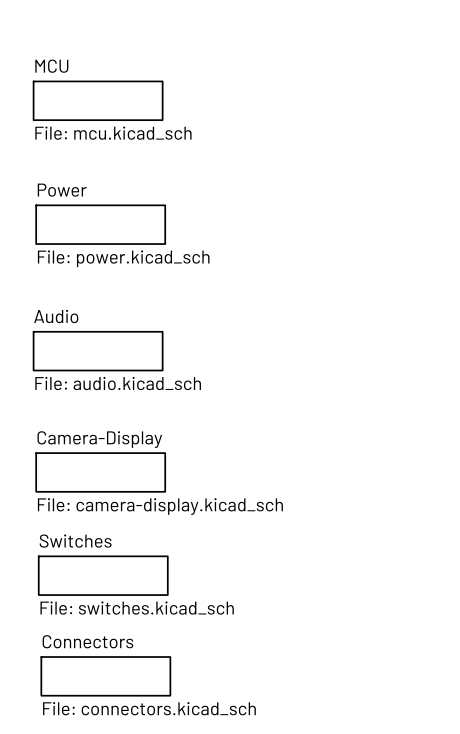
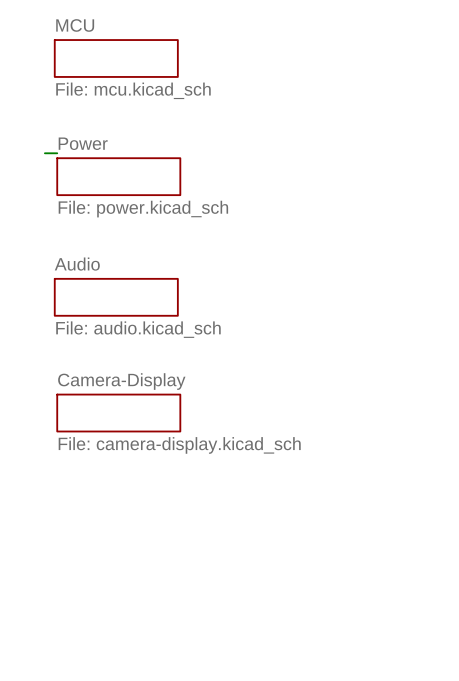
wire: none -> (44, 153) (57, 153)
sheet Switches: File: switches.kicad_sch (103, 575) -> none
sheet Connectors: File: connectors.kicad_sch (105, 676) -> none

